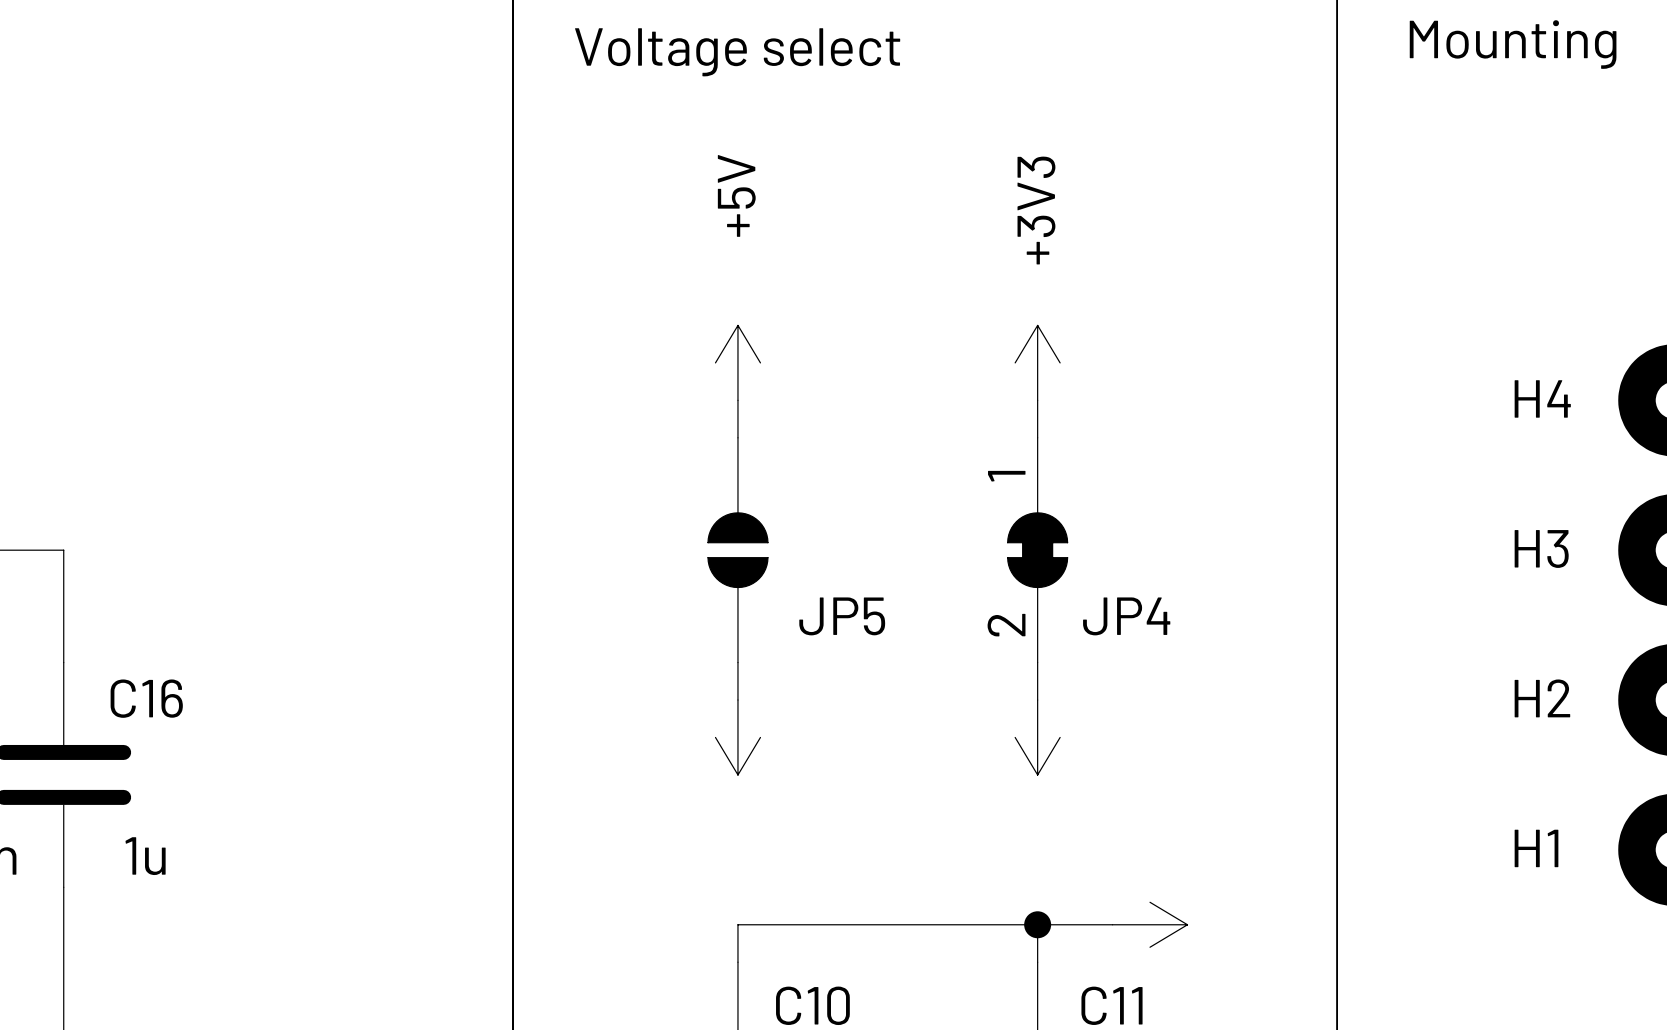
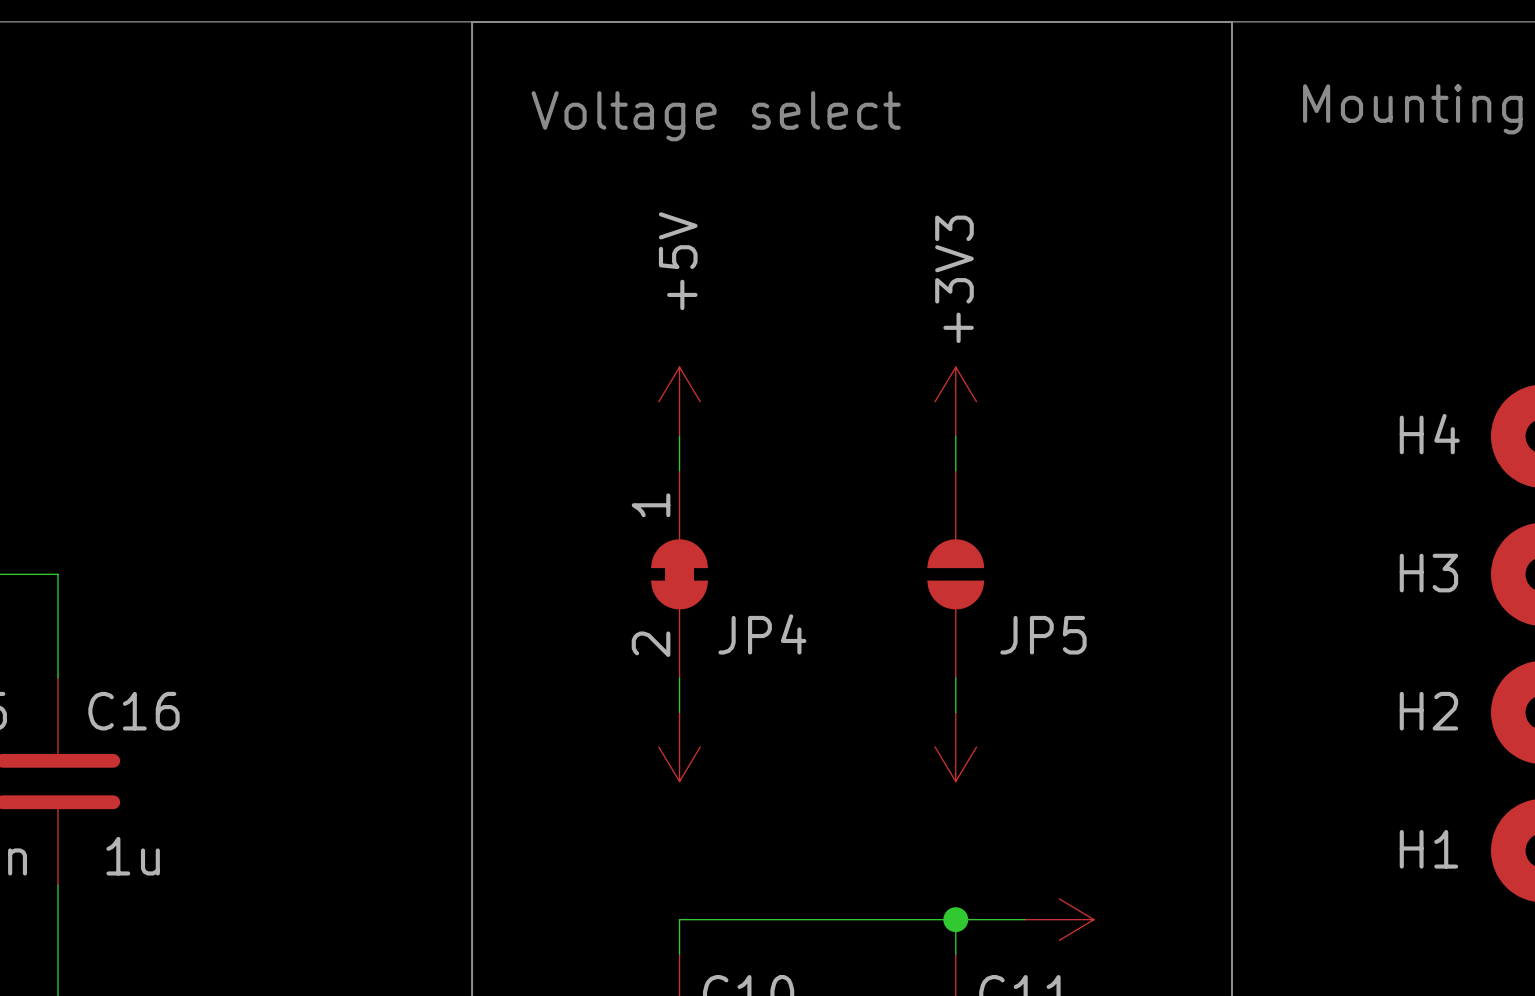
JP5 position: (737, 550) -> (955, 574)
JP4 position: (1037, 550) -> (679, 574)

